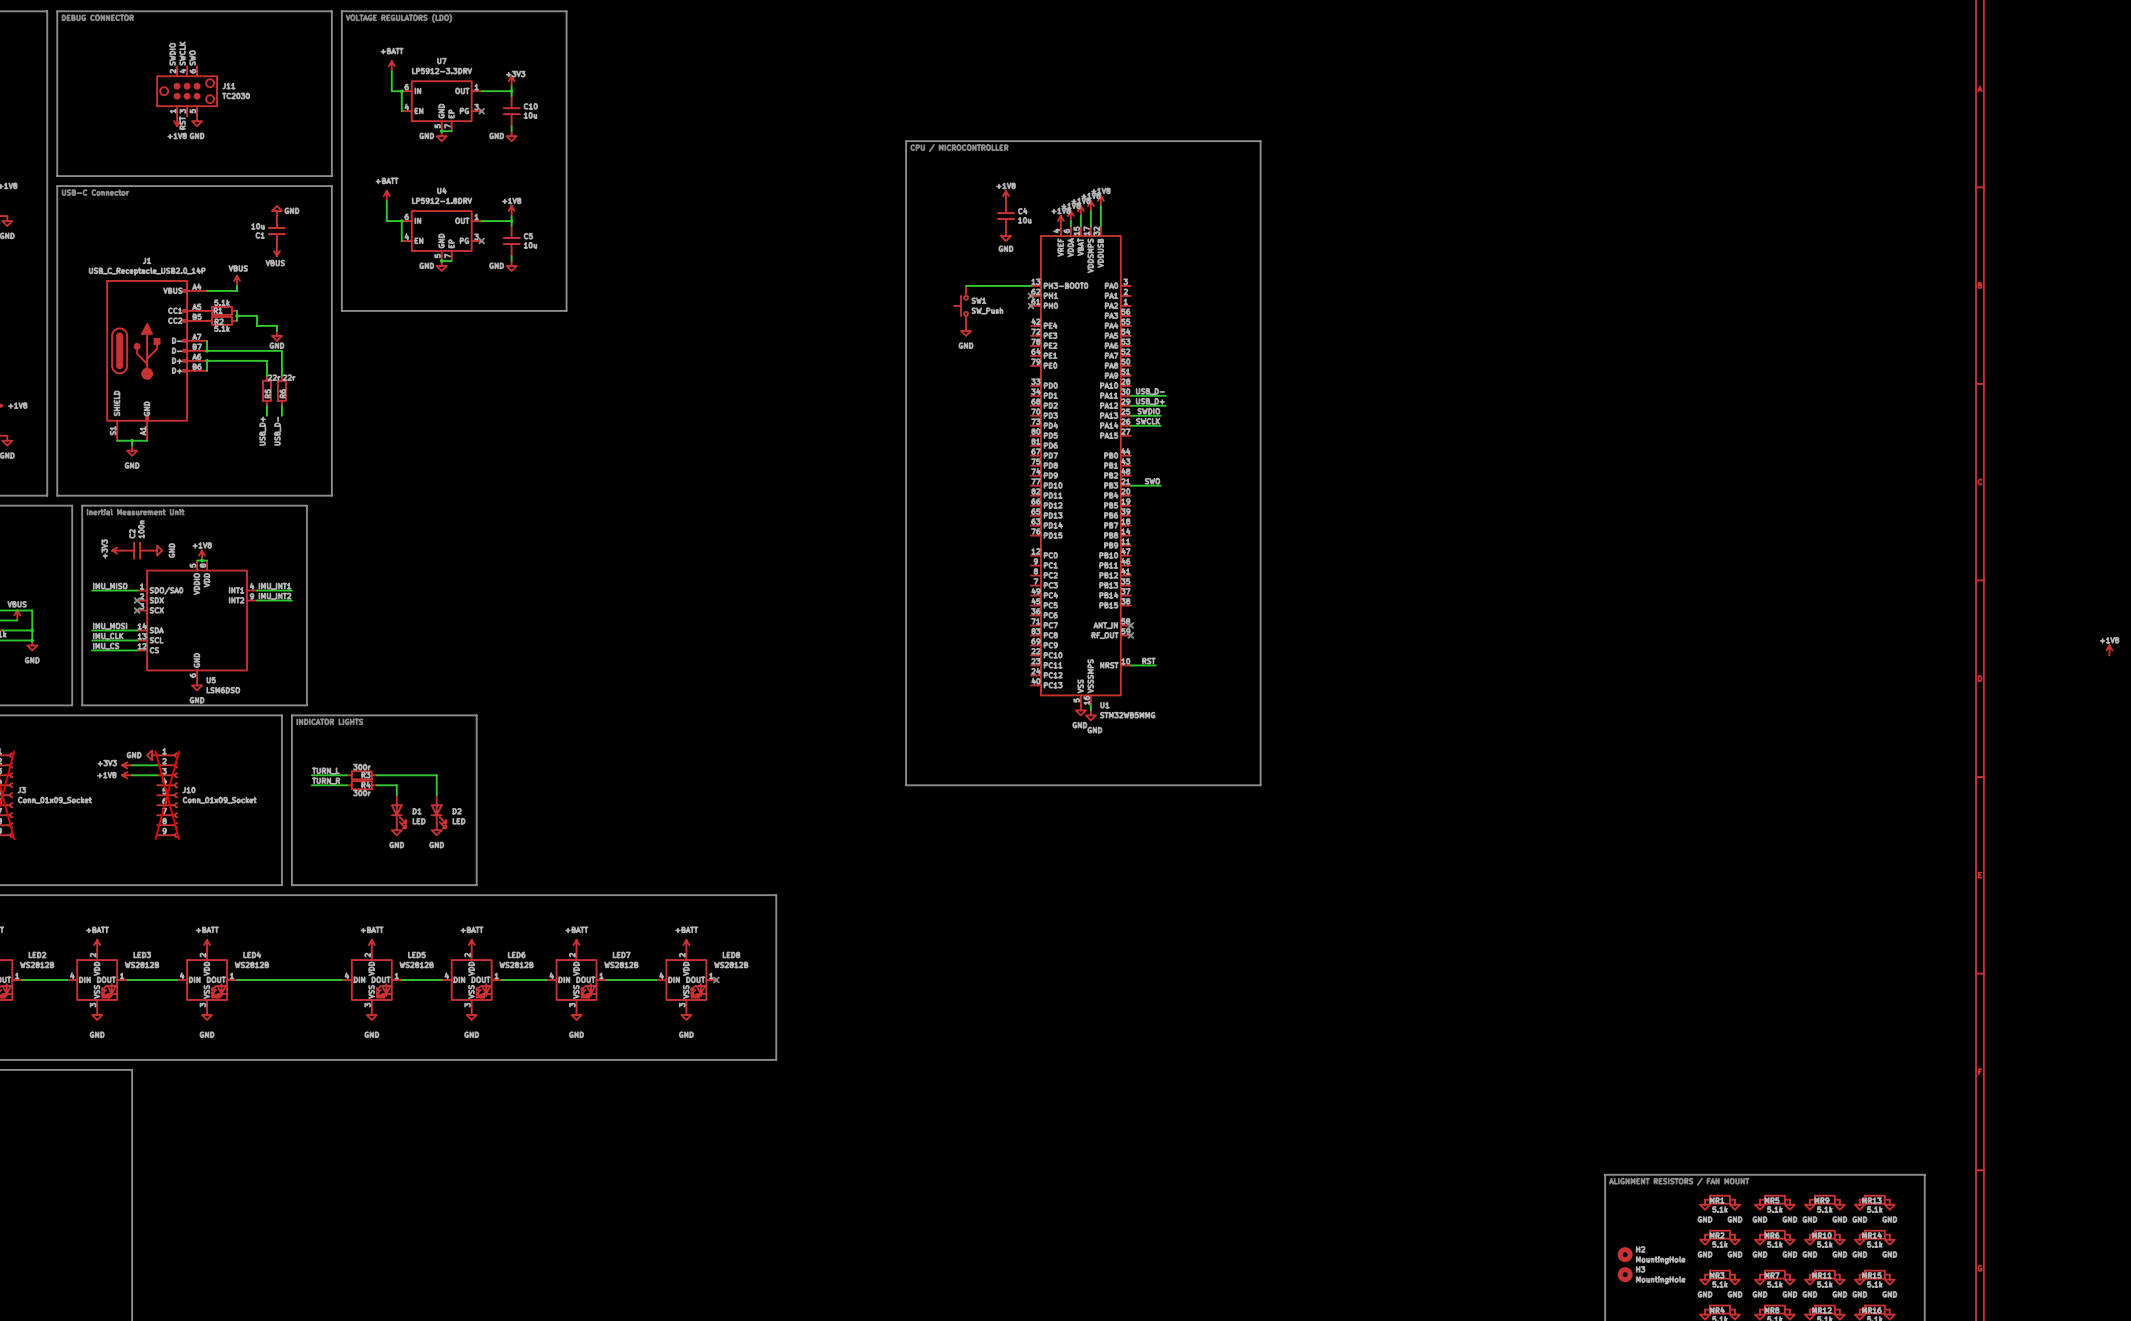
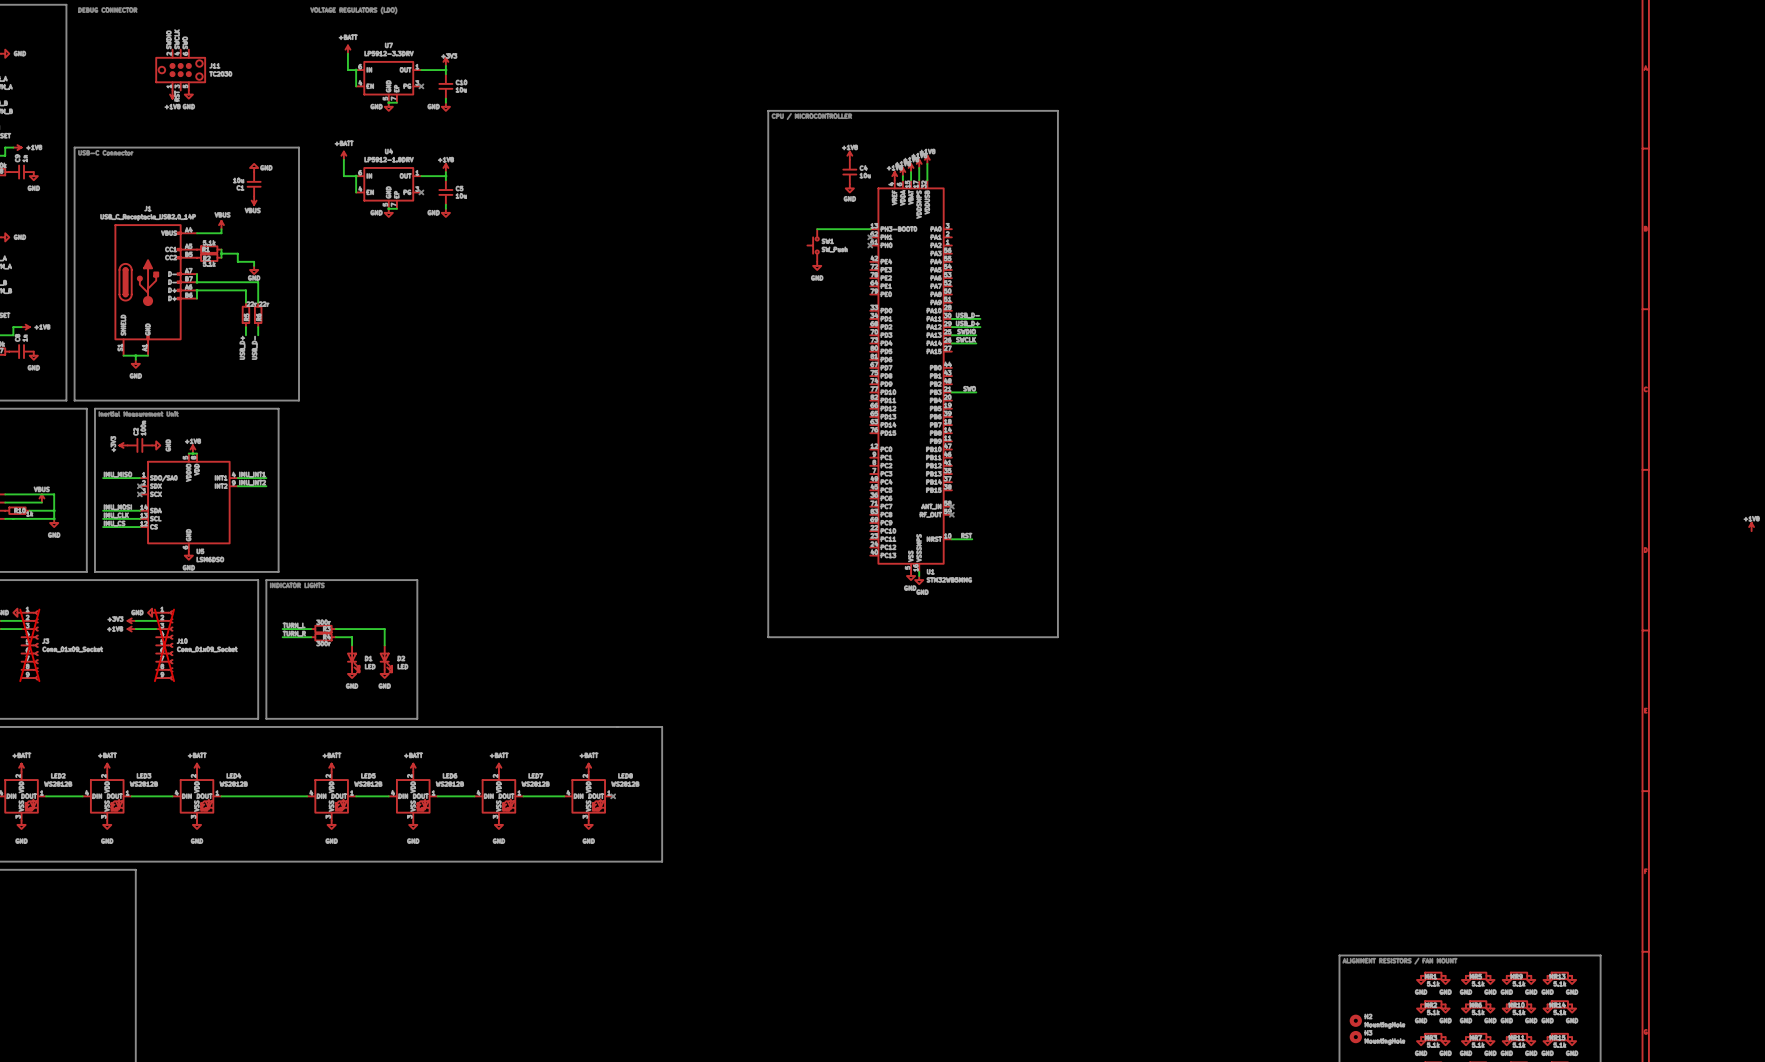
line: (57, 11) (331, 11) (331, 176) (57, 176) (57, 11) -> none
line: (341, 11) (566, 11) (566, 310) (341, 310) (341, 11) -> none

